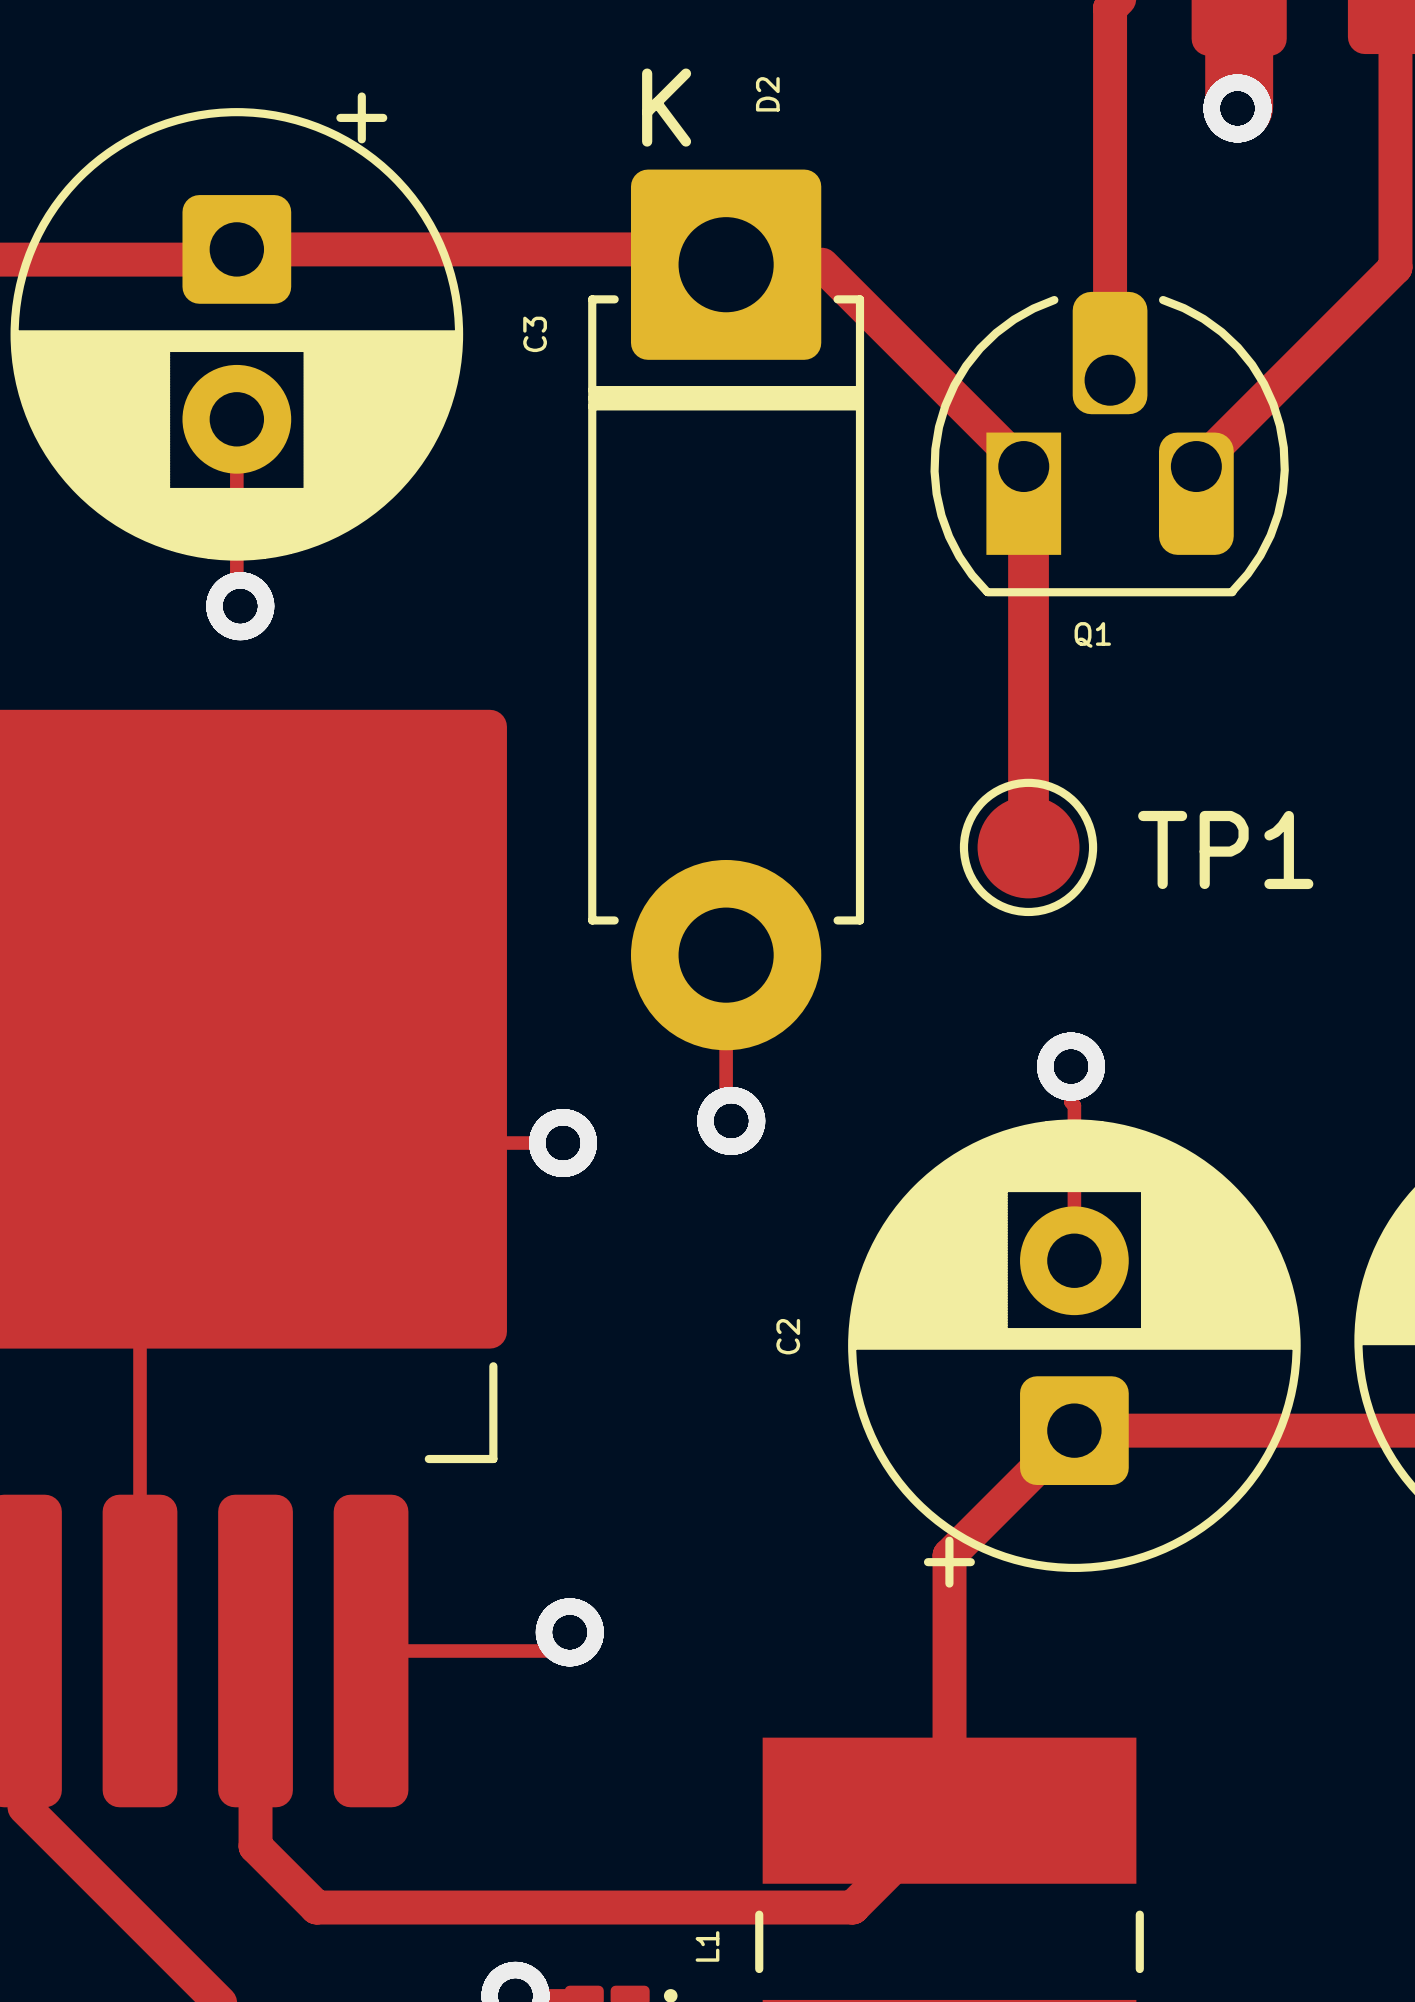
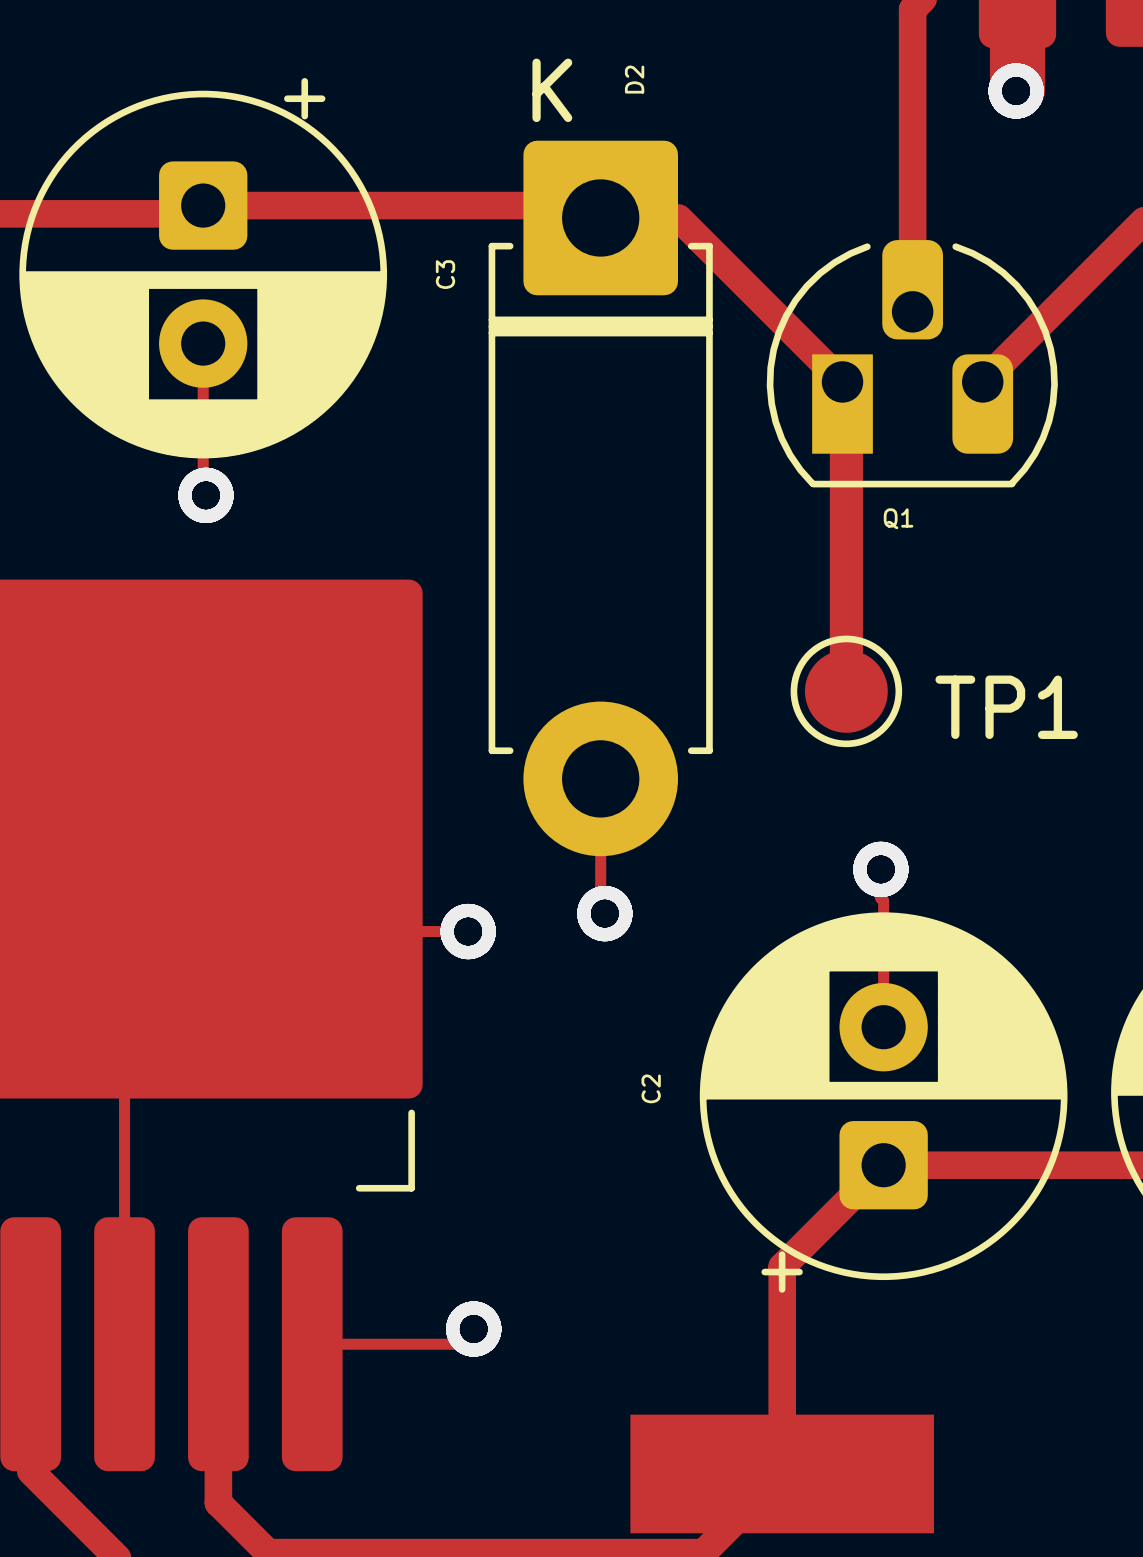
TP1 name position: TP1 (1225, 849) -> TP1 (1006, 707)

